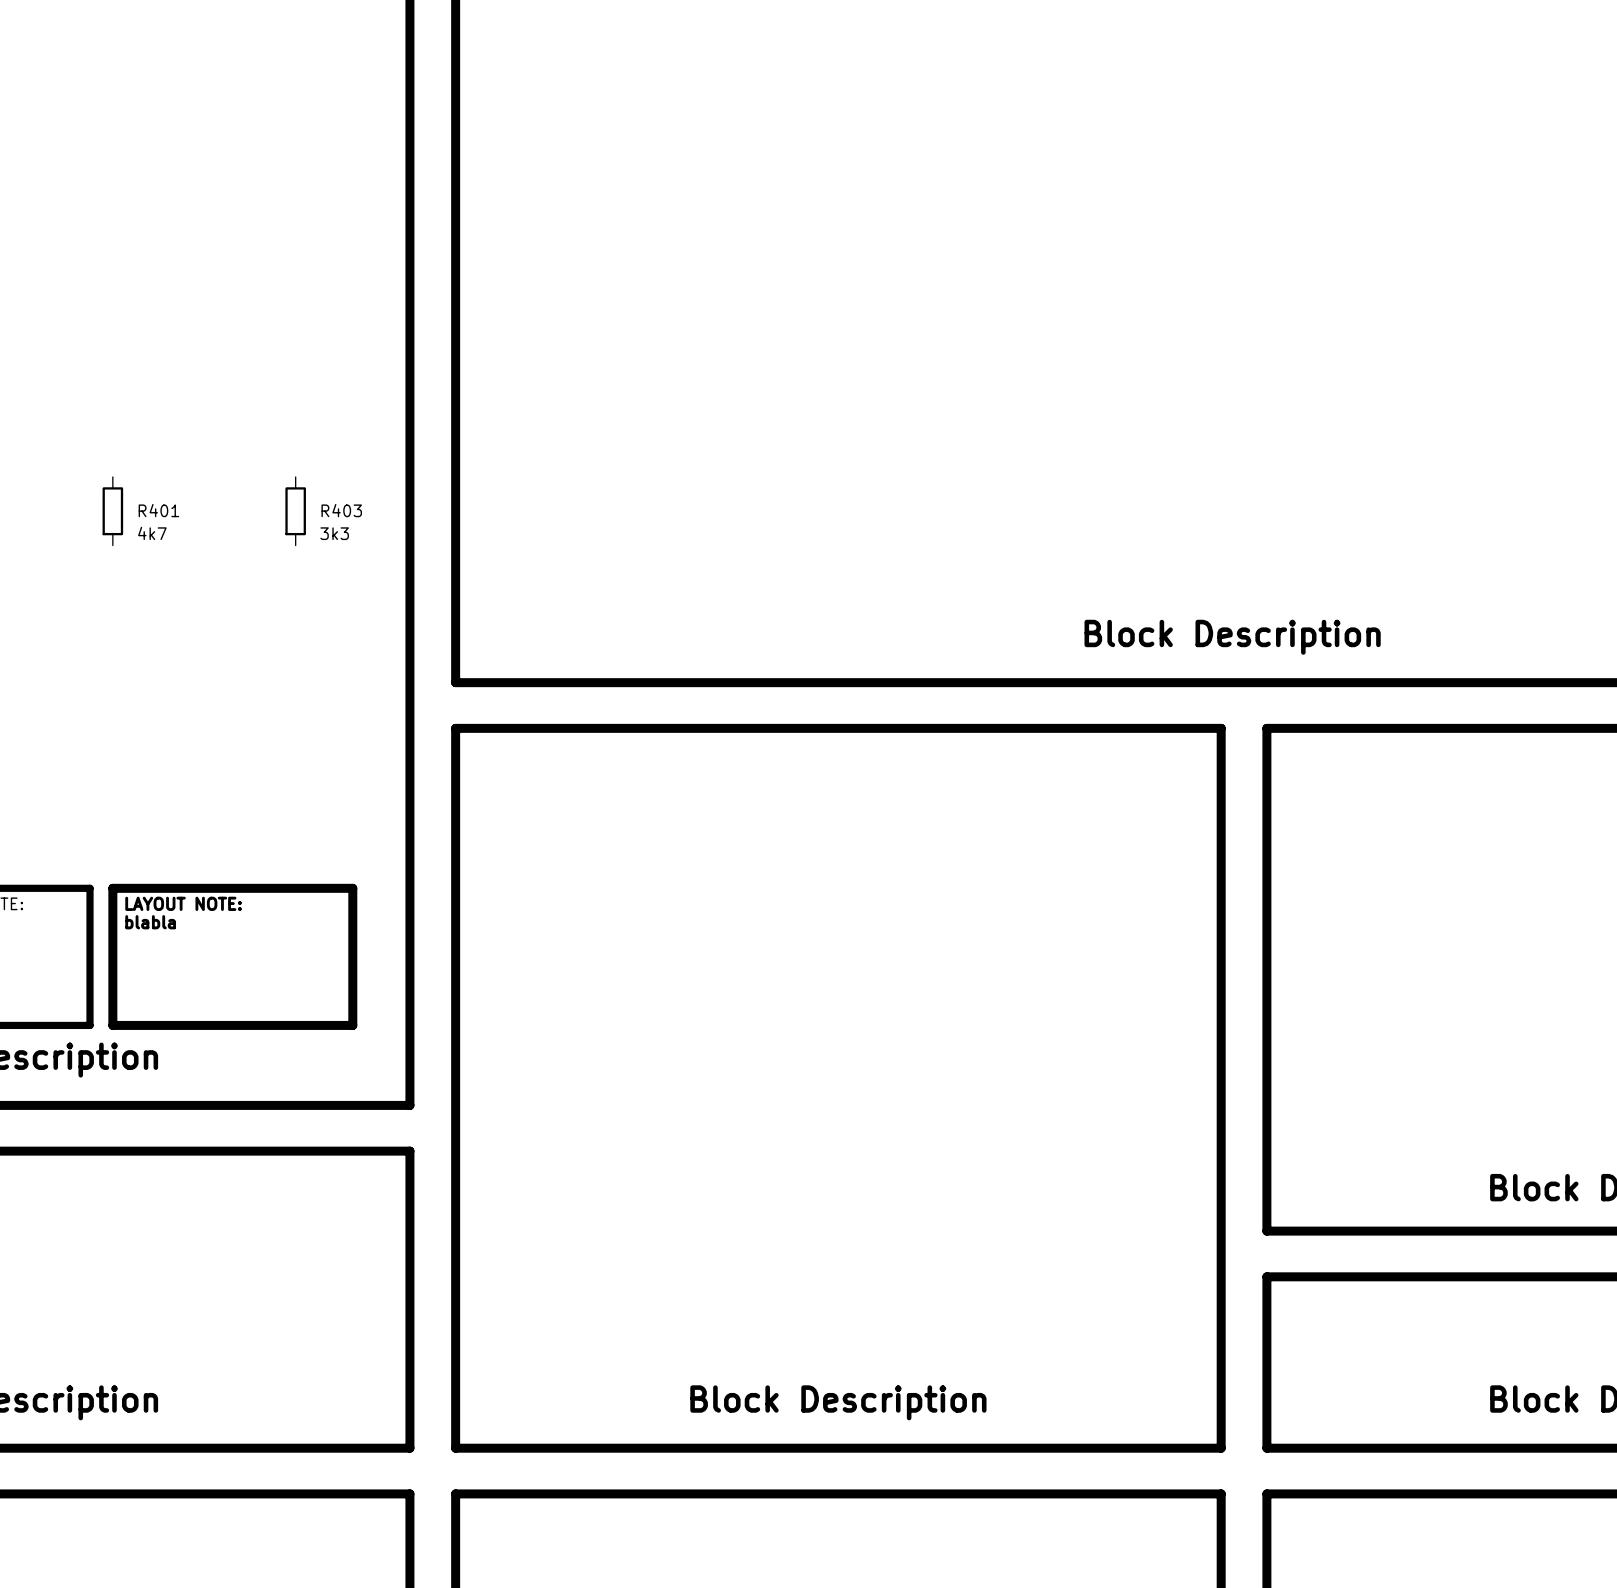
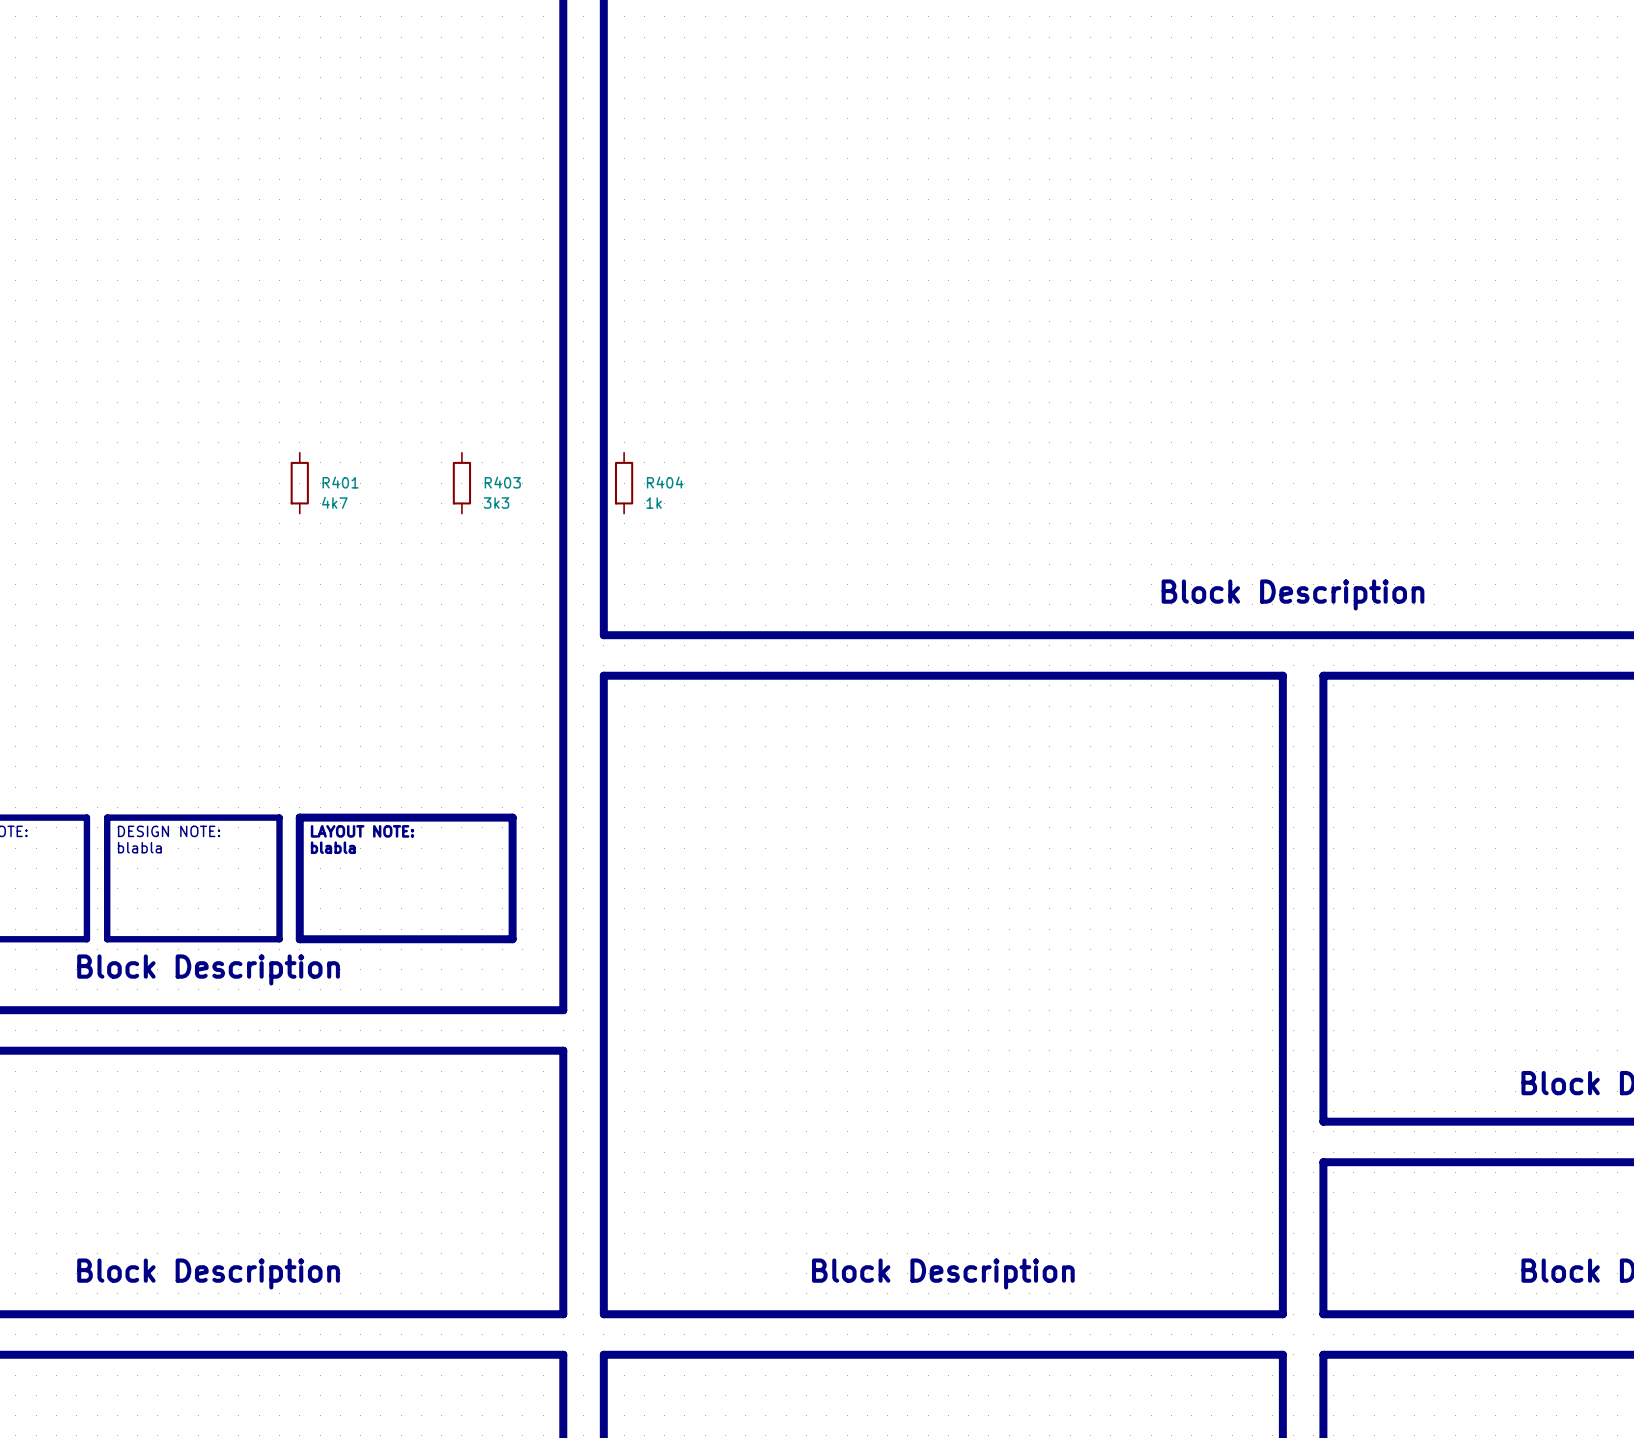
R404: none -> 1k (624, 483)

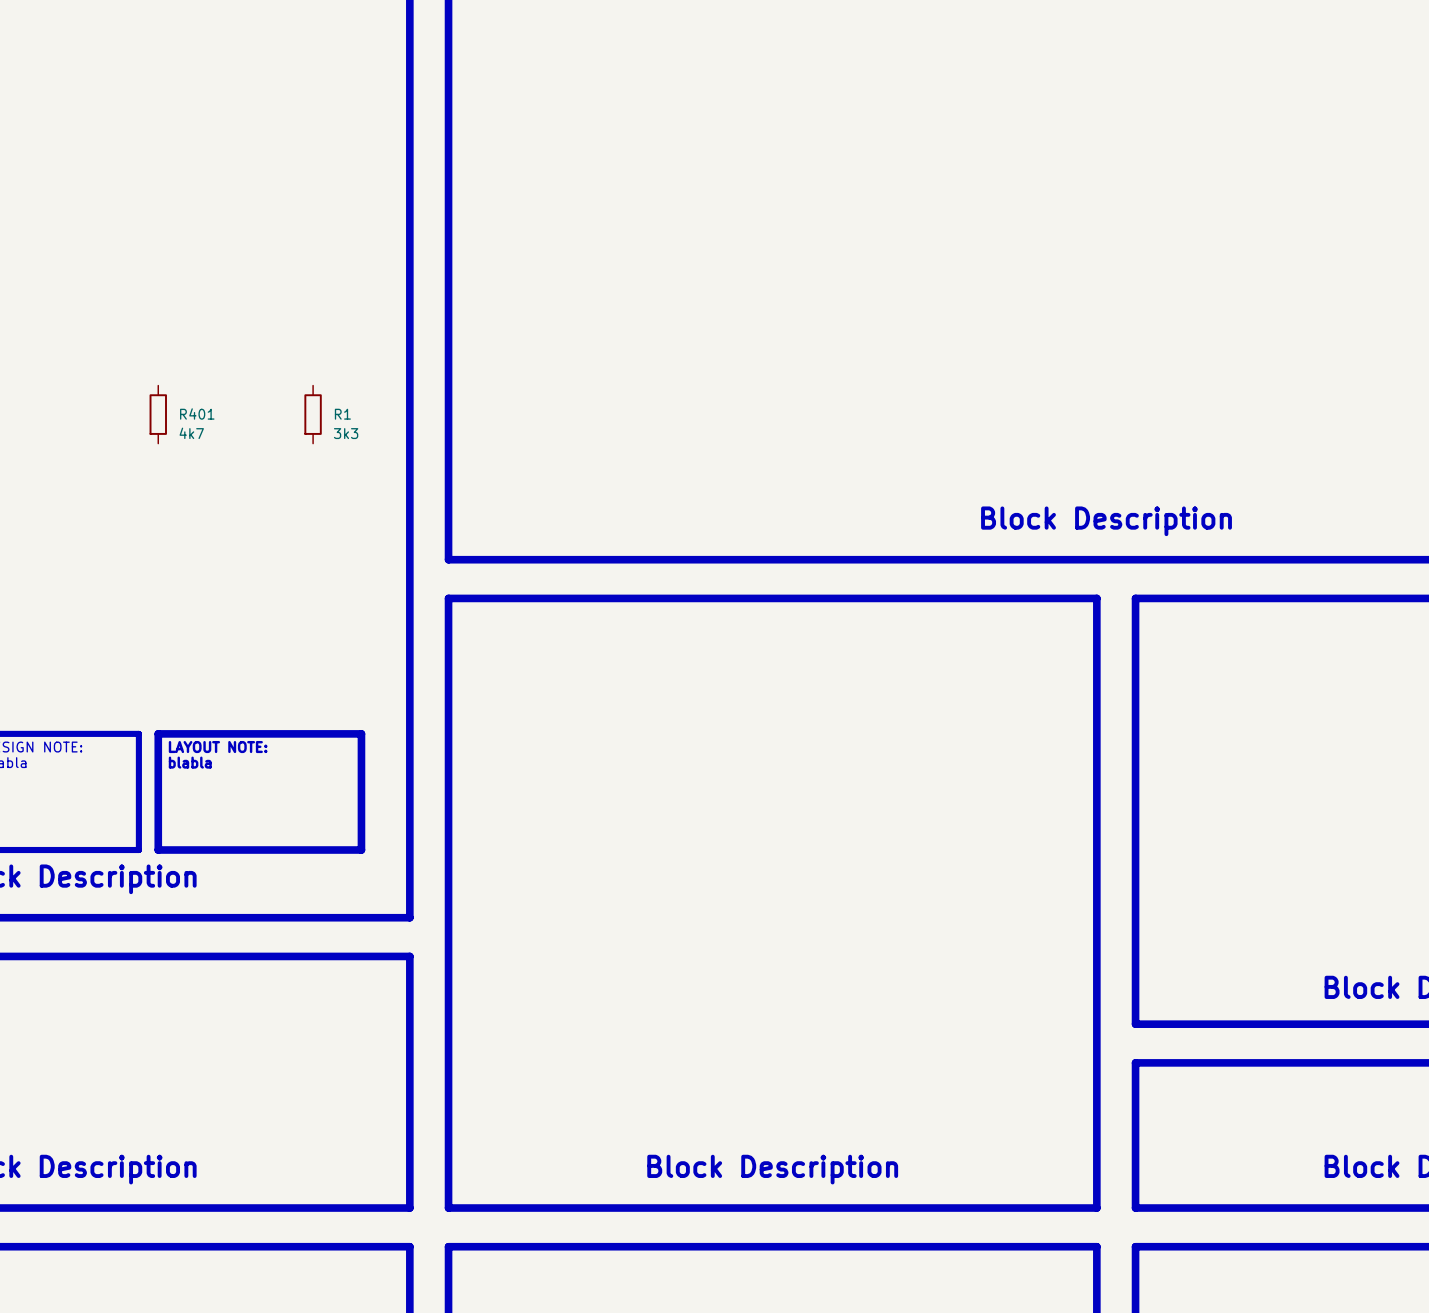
R403 name: R403 (502, 482) -> R1 (342, 414)
R404: 1k (624, 483) -> none

